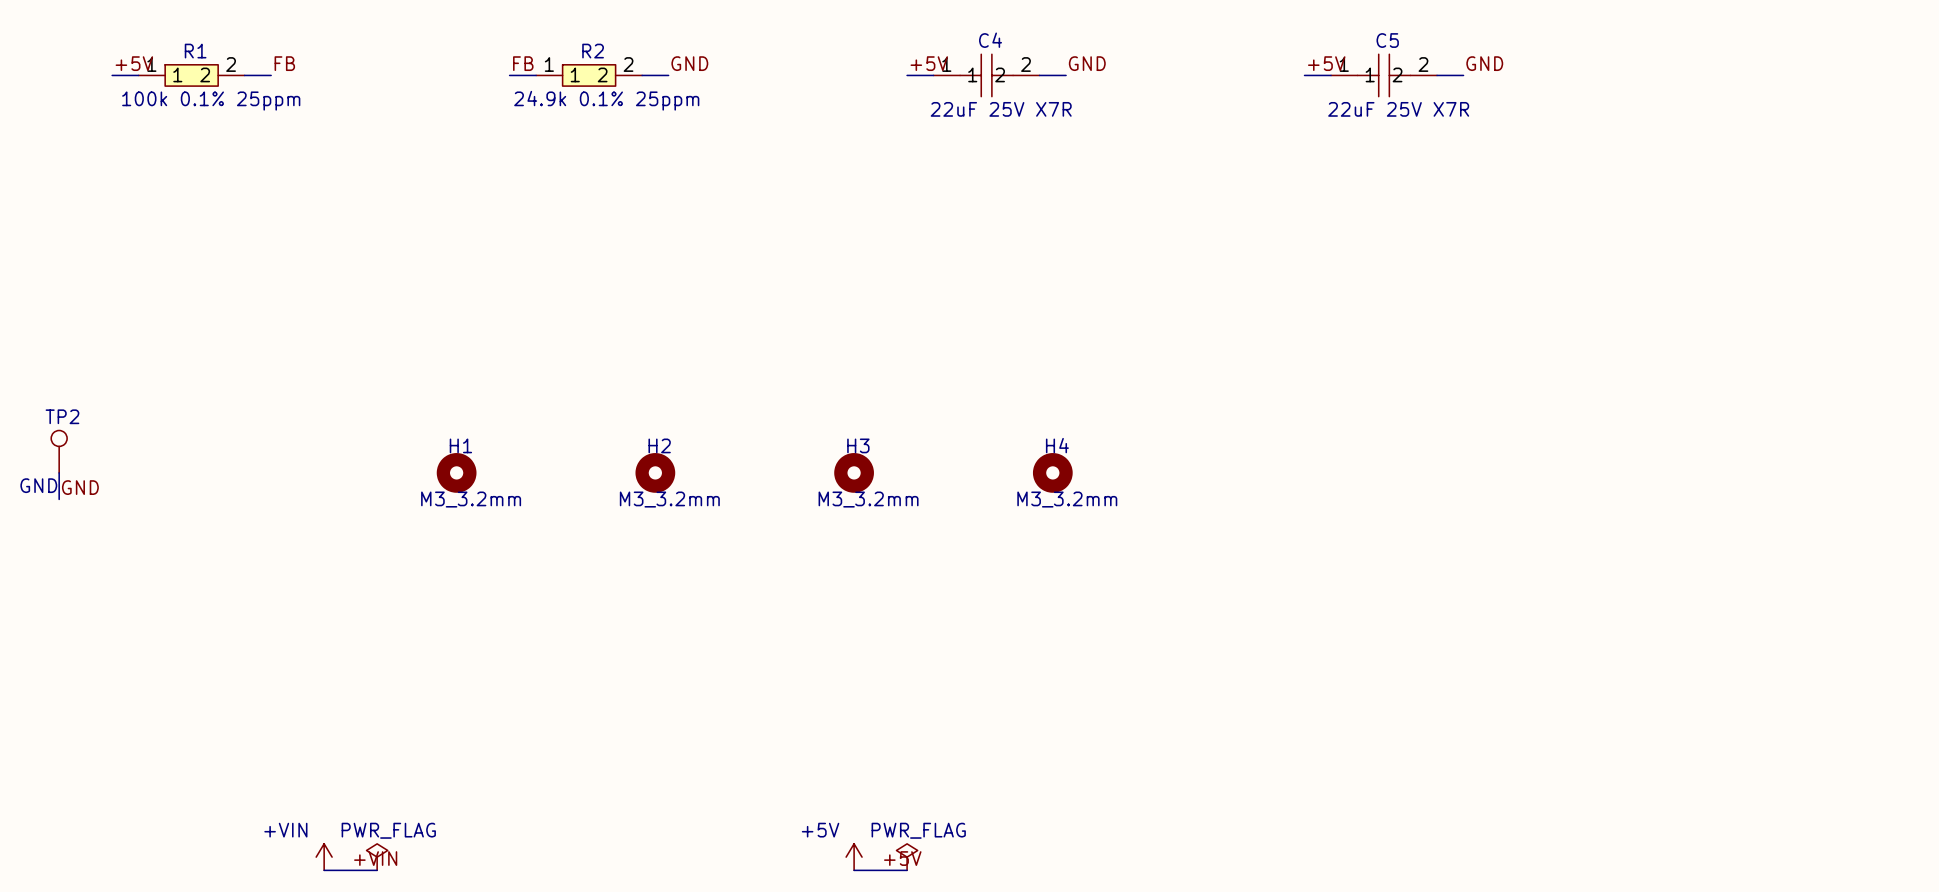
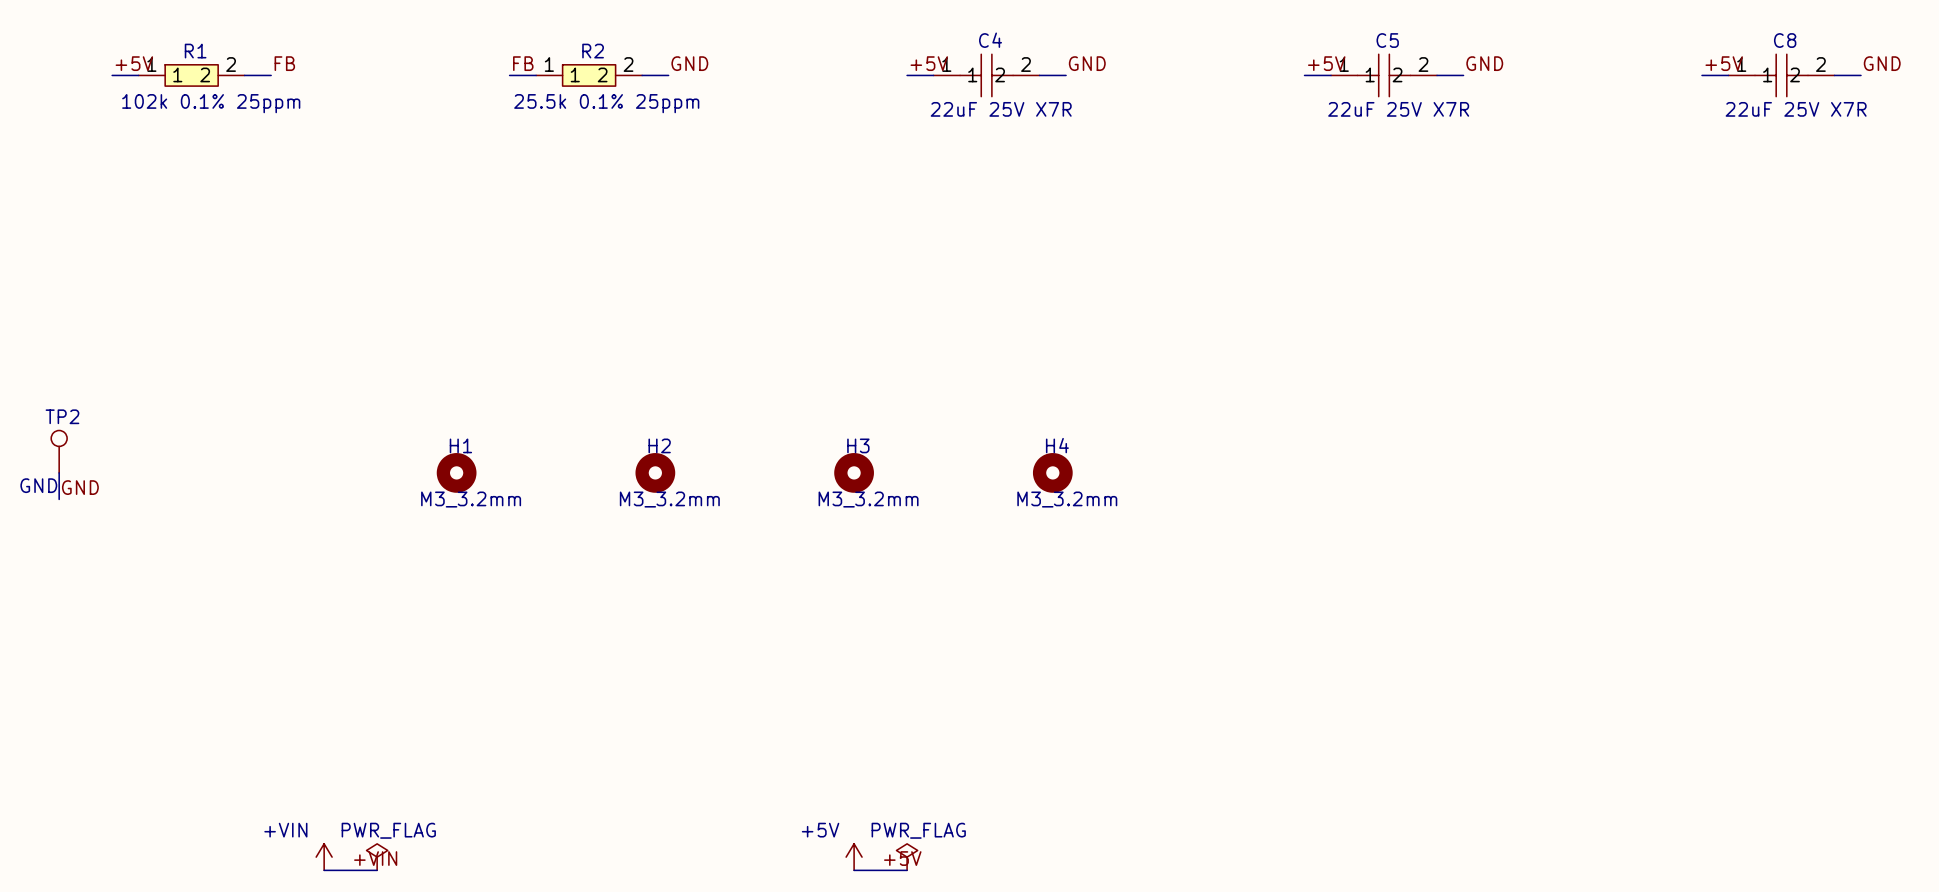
label: none -> +5V (1724, 63)
label: none -> GND (1882, 63)
wire: none -> (1702, 75) (1728, 75)
C8: none -> 22uF 25V X7R (1781, 75)
wire: none -> (1834, 75) (1860, 75)
R2 value: 24.9k 0.1% 25ppm (606, 100) -> 25.5k 0.1% 25ppm (606, 103)
R1 value: 100k 0.1% 25ppm (211, 101) -> 102k 0.1% 25ppm (211, 103)

